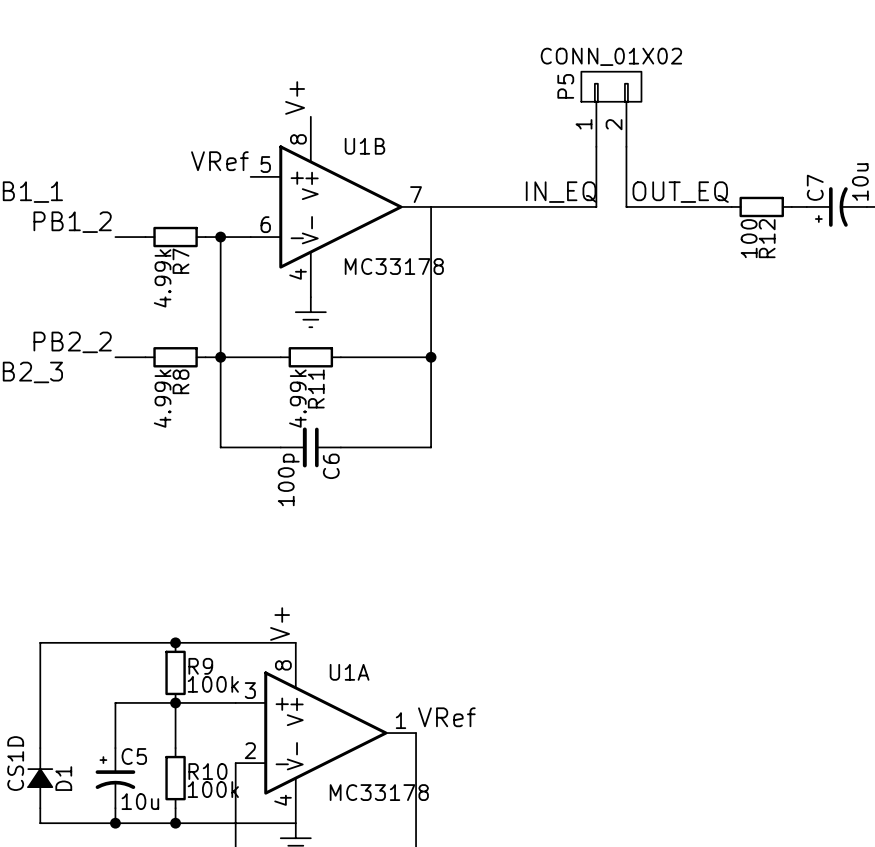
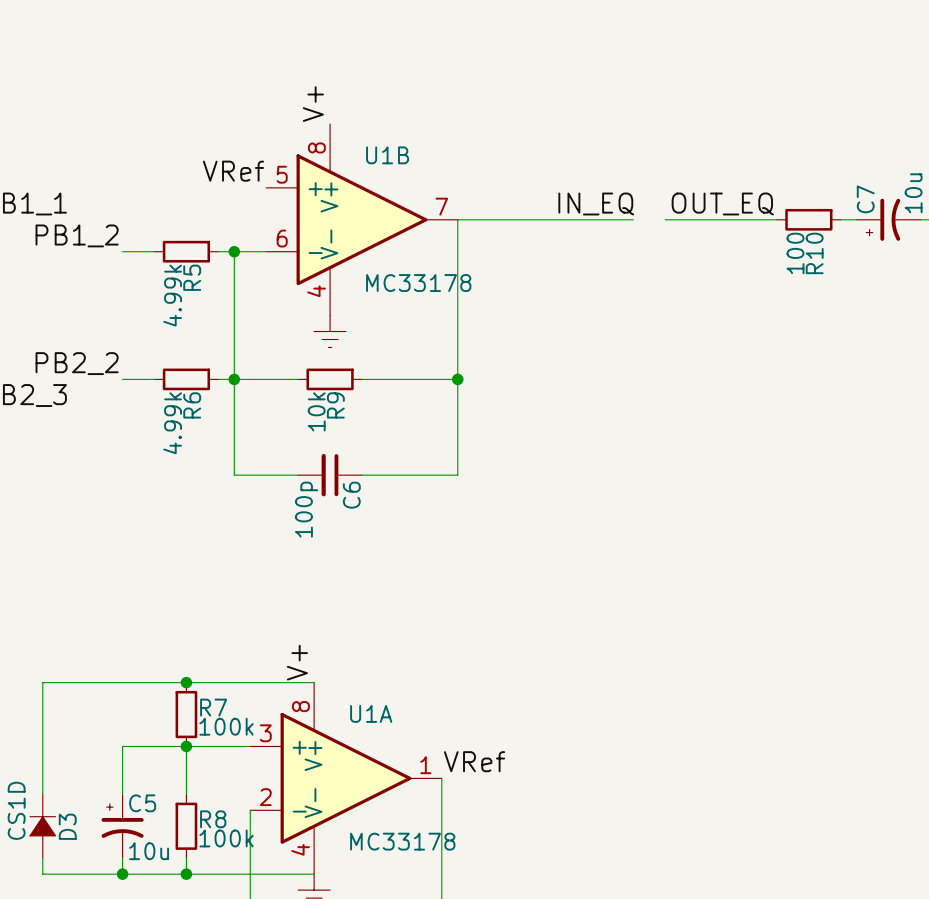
P5: CONN_01X02 (611, 109) -> none
wire: (596, 146) (596, 206) -> none
wire: (626, 146) (626, 206) -> none
R12 name: R12 (767, 238) -> R10 (814, 253)
R7 name: R7 (181, 261) -> R5 (192, 277)
R8 name: R8 (181, 381) -> R6 (192, 405)
R11 name: R11 (316, 388) -> R9 (335, 405)
R11 value: 4.99k (297, 398) -> 10k (316, 411)
R9 name: R9 (200, 666) -> R7 (213, 707)
R10 name: R10 (207, 771) -> R8 (213, 819)
D1 name: D1 (63, 778) -> D3 (67, 826)

